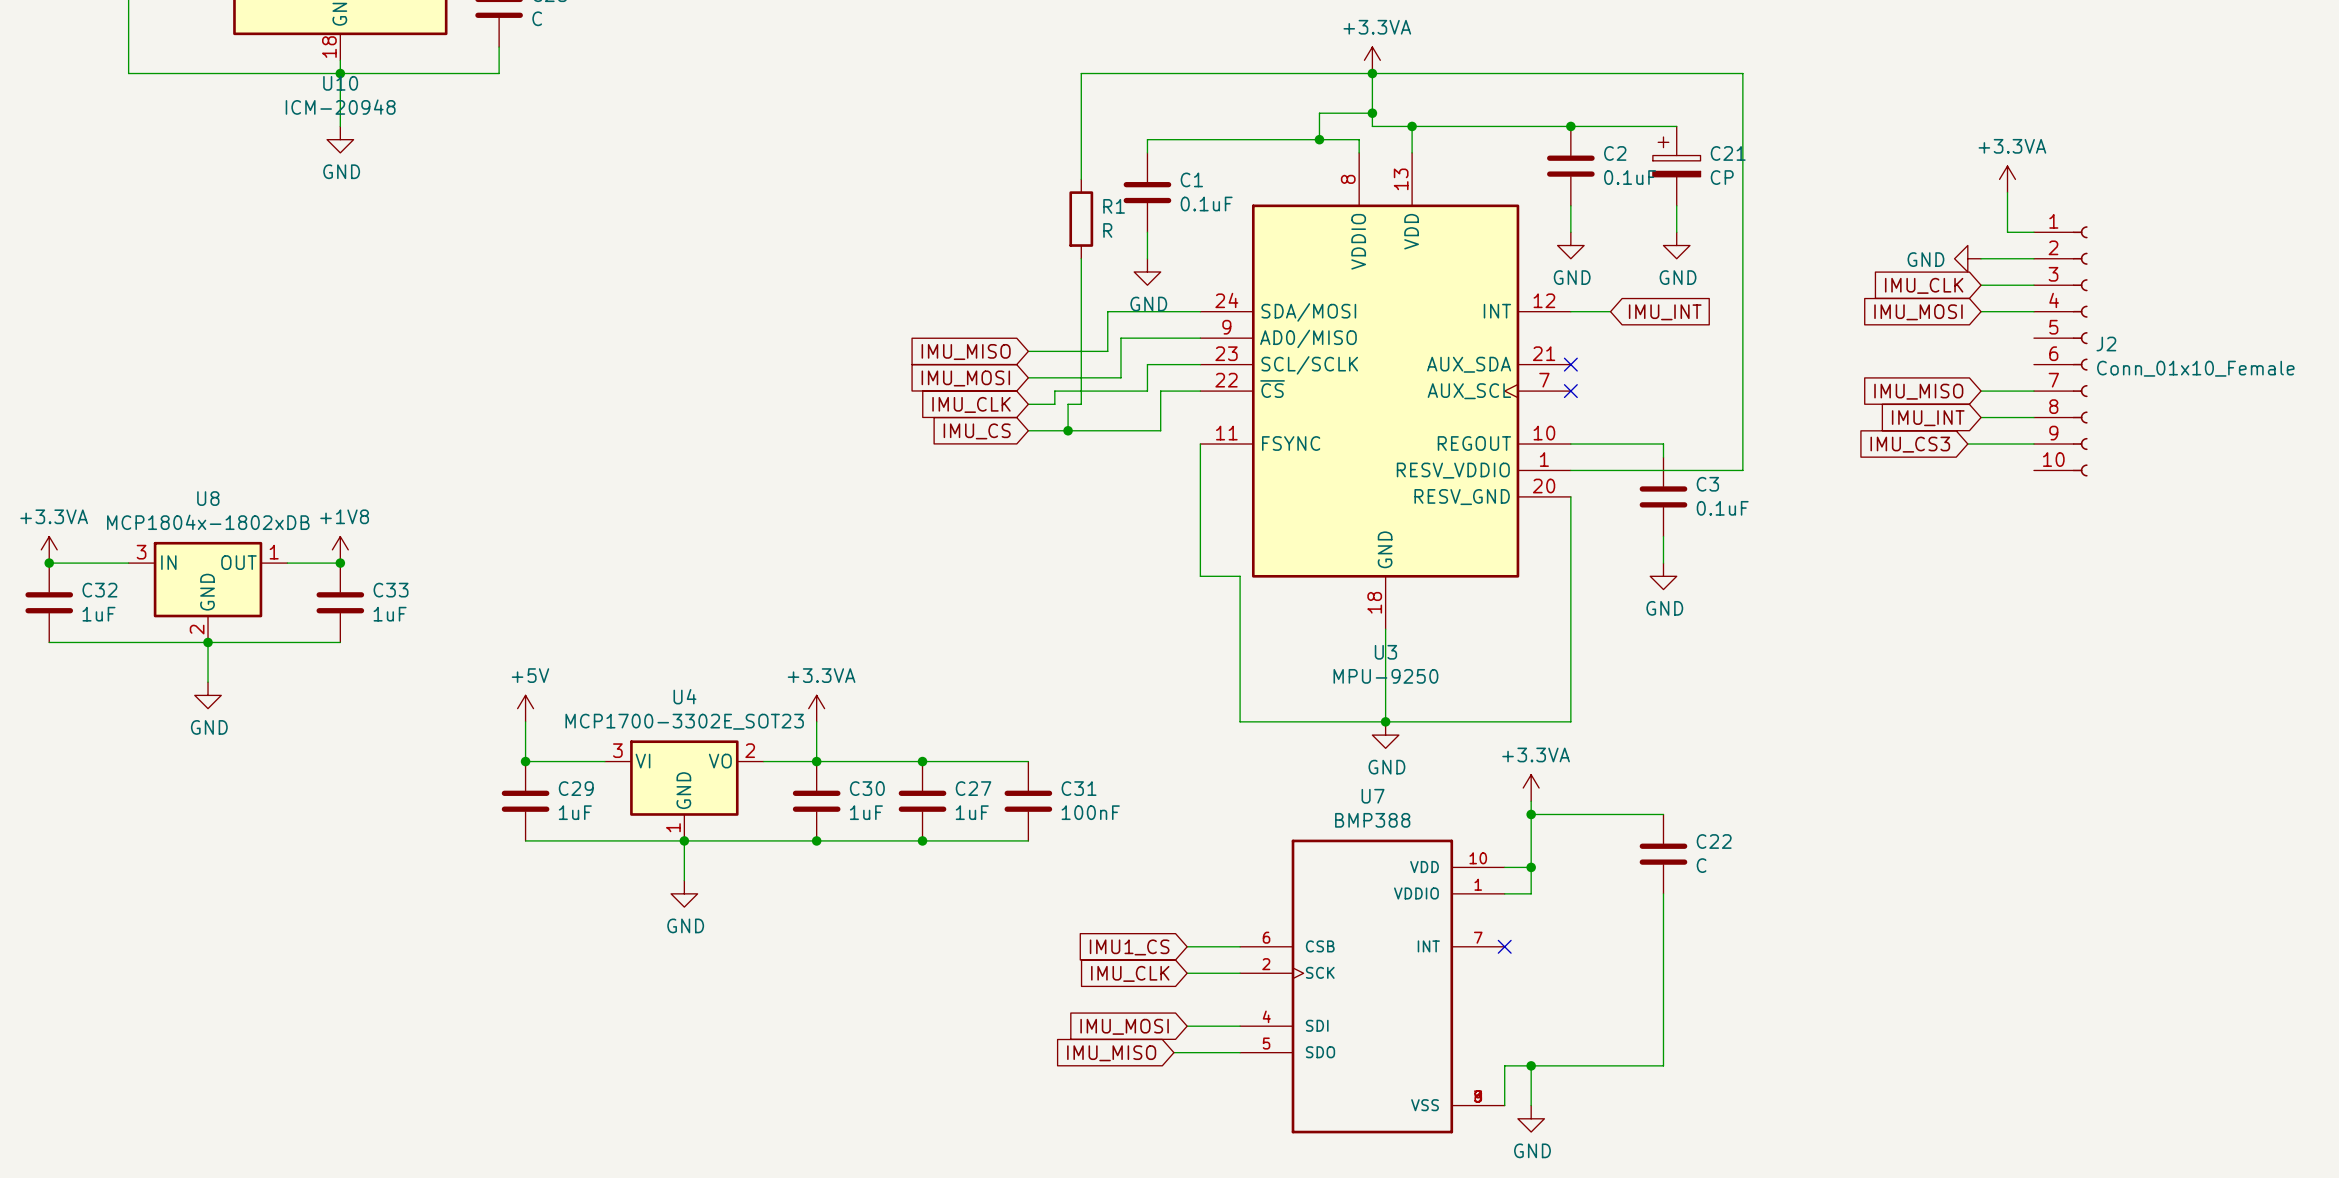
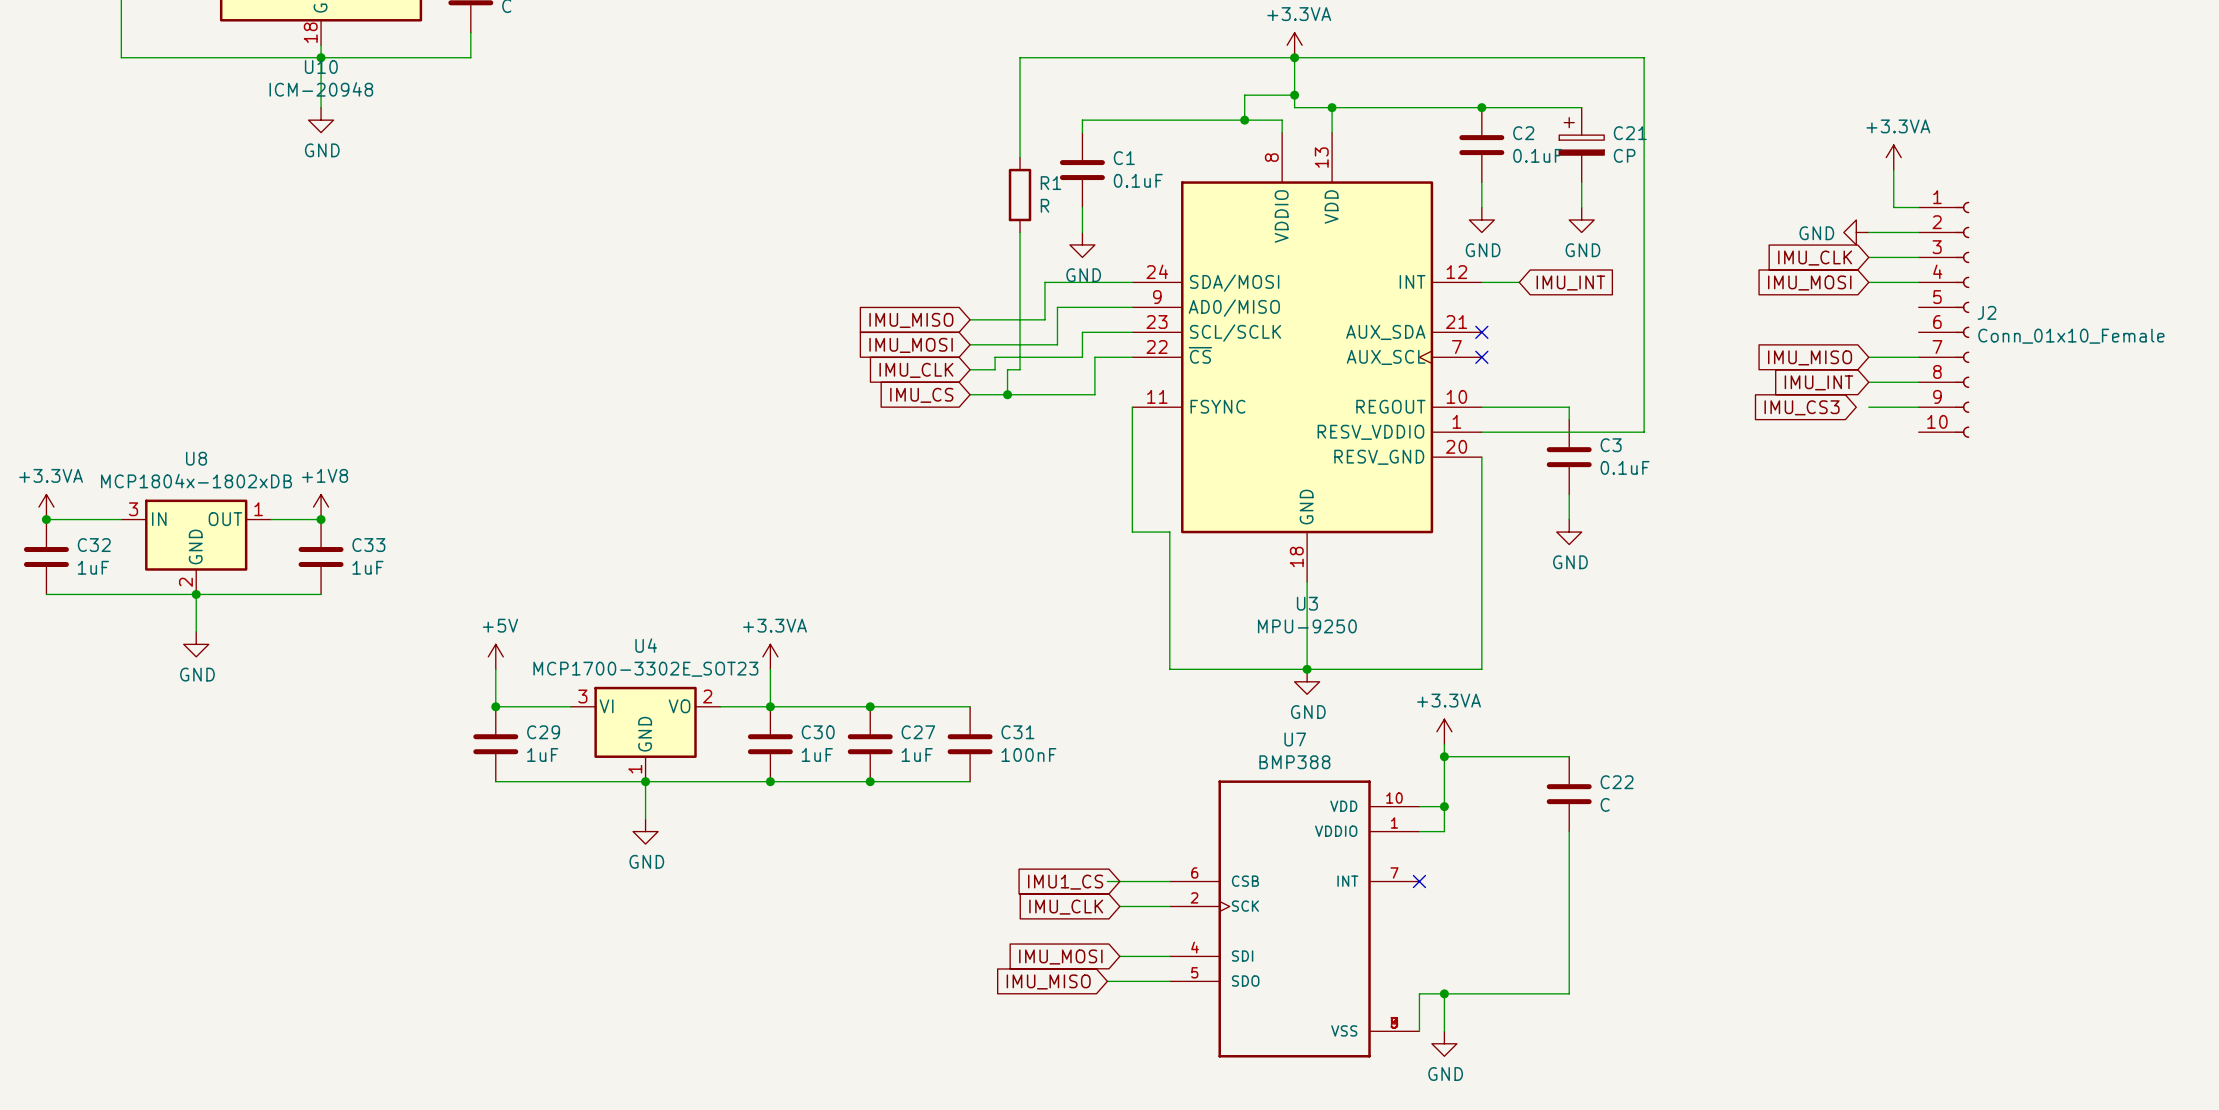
wire: (1967, 444) (1981, 444) -> none
wire: none -> (1107, 881) (1119, 881)

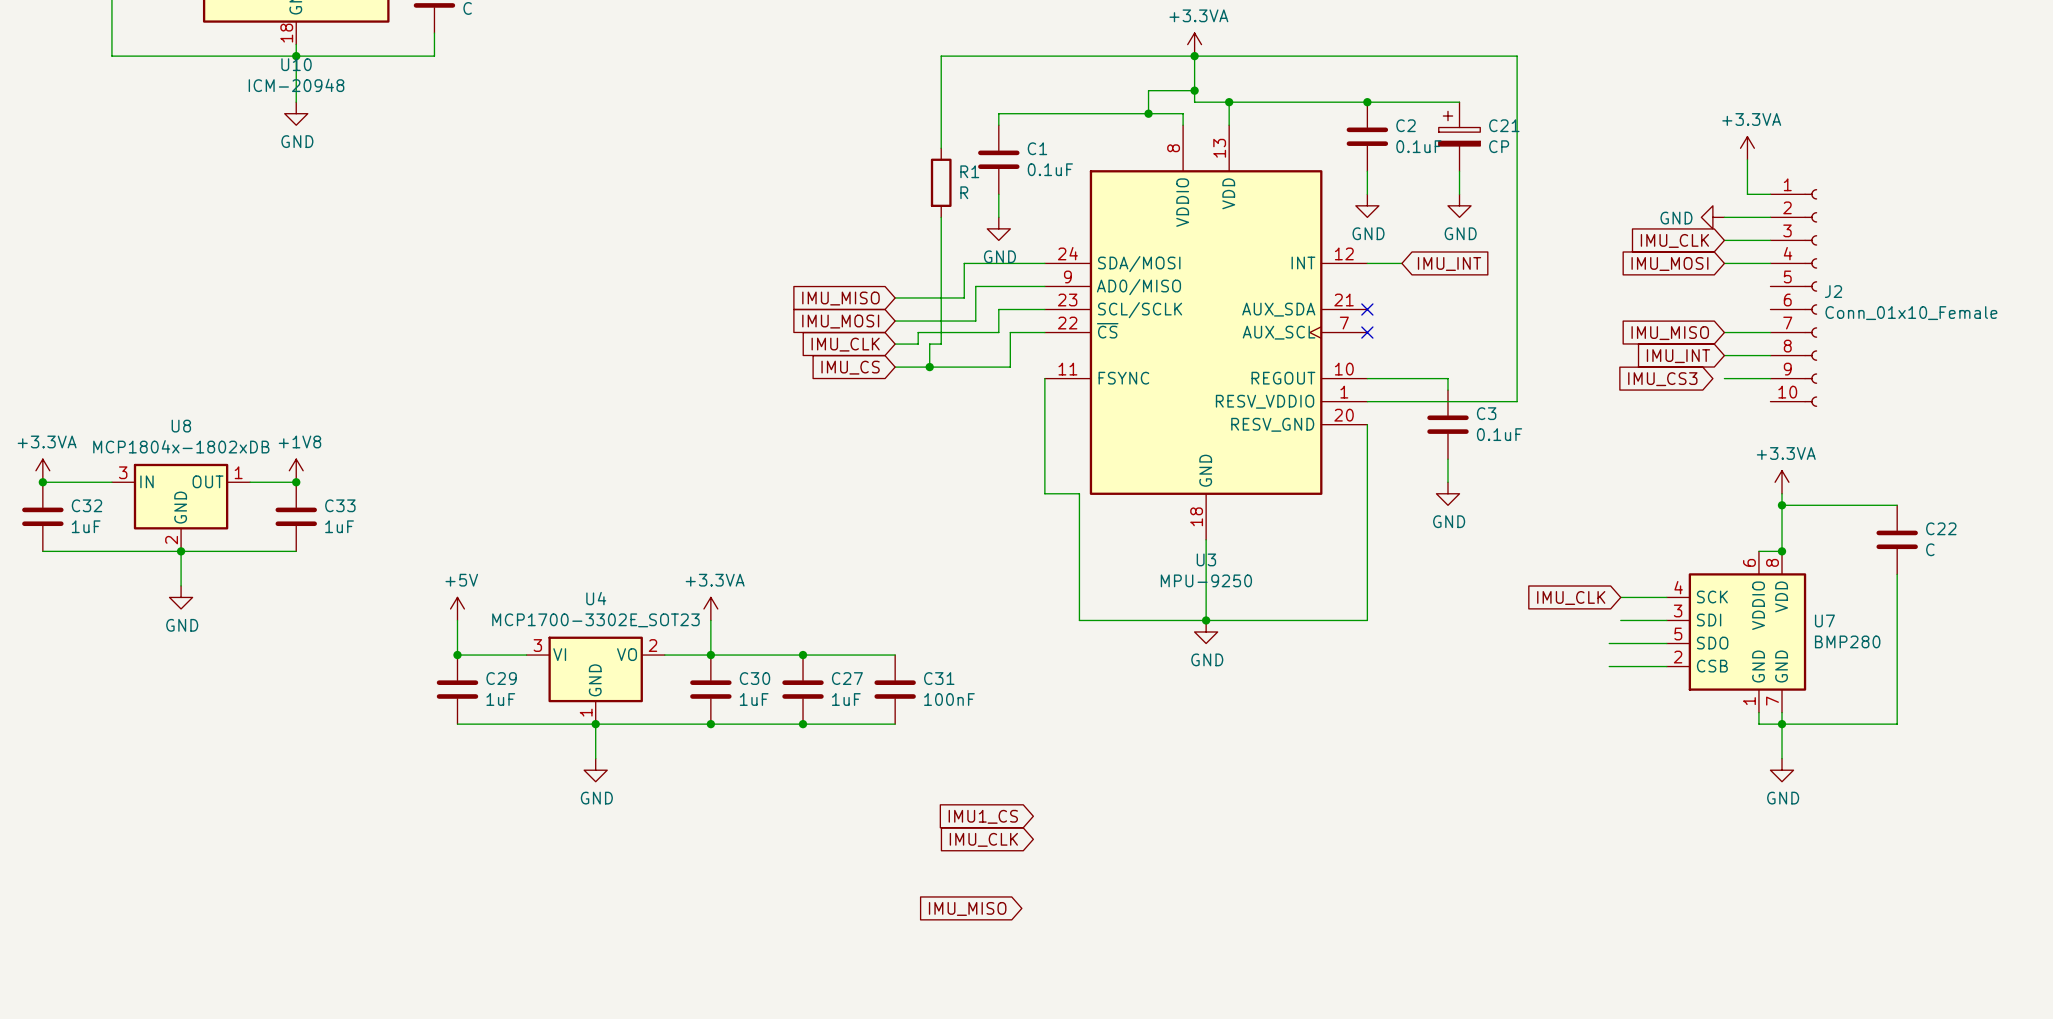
power symbol: none -> +3.3VA (1782, 482)
wire: none -> (1782, 493) (1782, 551) (1758, 551)
wire: none -> (1782, 505) (1897, 505)
junction: none -> (1782, 505)
junction: none -> (1782, 551)
wire: none -> (1897, 574) (1897, 724) (1758, 724) (1758, 712)
global label: none -> IMU_CLK (1571, 597)
wire: none -> (1620, 597) (1666, 597)
wire: none -> (1620, 620) (1666, 620)
wire: none -> (1609, 643) (1666, 643)
wire: none -> (1609, 666) (1666, 666)
power symbol: +3.3VA (1444, 731) -> none
U7 name position: U7 (1295, 739) -> U7 (1824, 620)
wire: (1444, 744) (1444, 831) (1419, 831) -> none
wire: (1444, 756) (1569, 756) -> none
junction: (1444, 756) -> none
U7 value: BMP388 (1294, 762) -> BMP280 (1847, 641)
wire: none -> (1782, 712) (1782, 758)
U7 symbol: [1169, 780, 1420, 1058] -> [1666, 551, 1807, 713]
junction: none -> (1782, 724)
C22 position: (1569, 794) -> (1897, 539)
wire: (1419, 806) (1444, 806) -> none
junction: (1444, 806) -> none
wire: (1569, 831) (1569, 993) (1419, 993) (1419, 1031) -> none
power symbol: none -> GND (1782, 770)
wire: (1107, 881) (1169, 881) -> none
no-connect mark: (1419, 881) -> none
wire: (1119, 906) (1169, 906) -> none
wire: (1119, 956) (1169, 956) -> none
global label: IMU_MOSI (1060, 957) -> none
wire: (1107, 981) (1169, 981) -> none
wire: (1444, 993) (1444, 1031) -> none
junction: (1444, 993) -> none
power symbol: GND (1444, 1043) -> none

